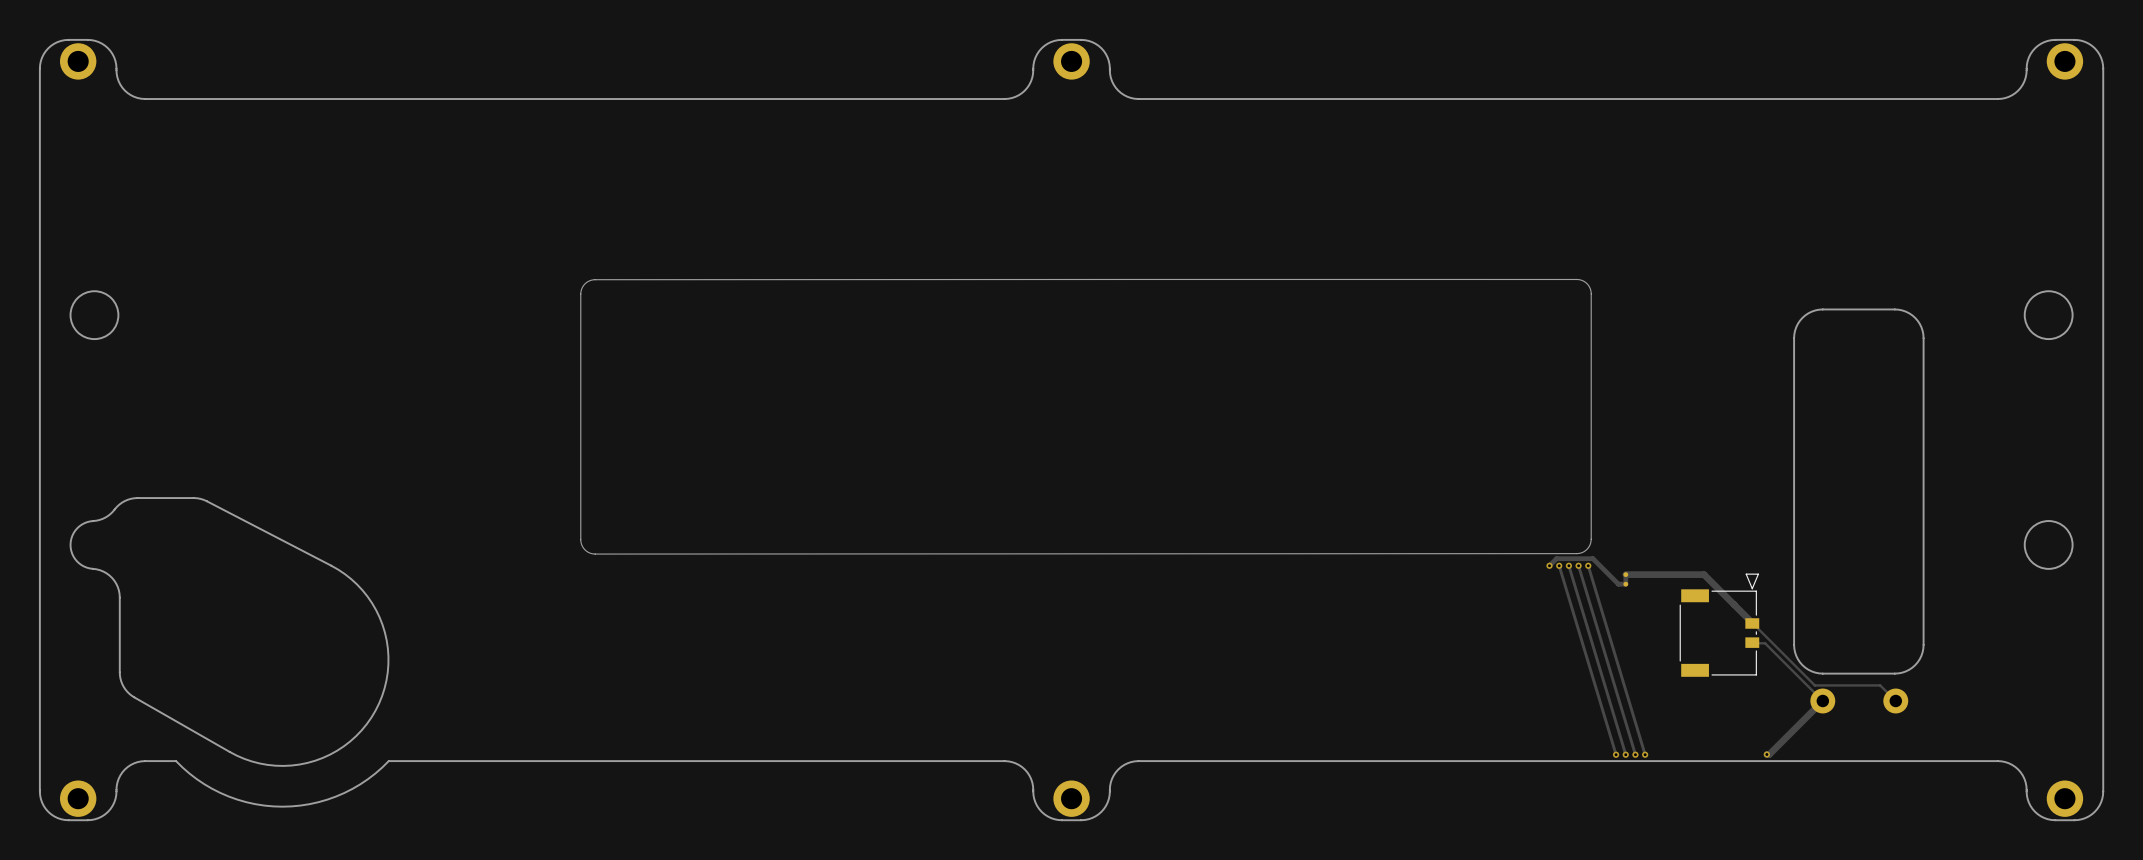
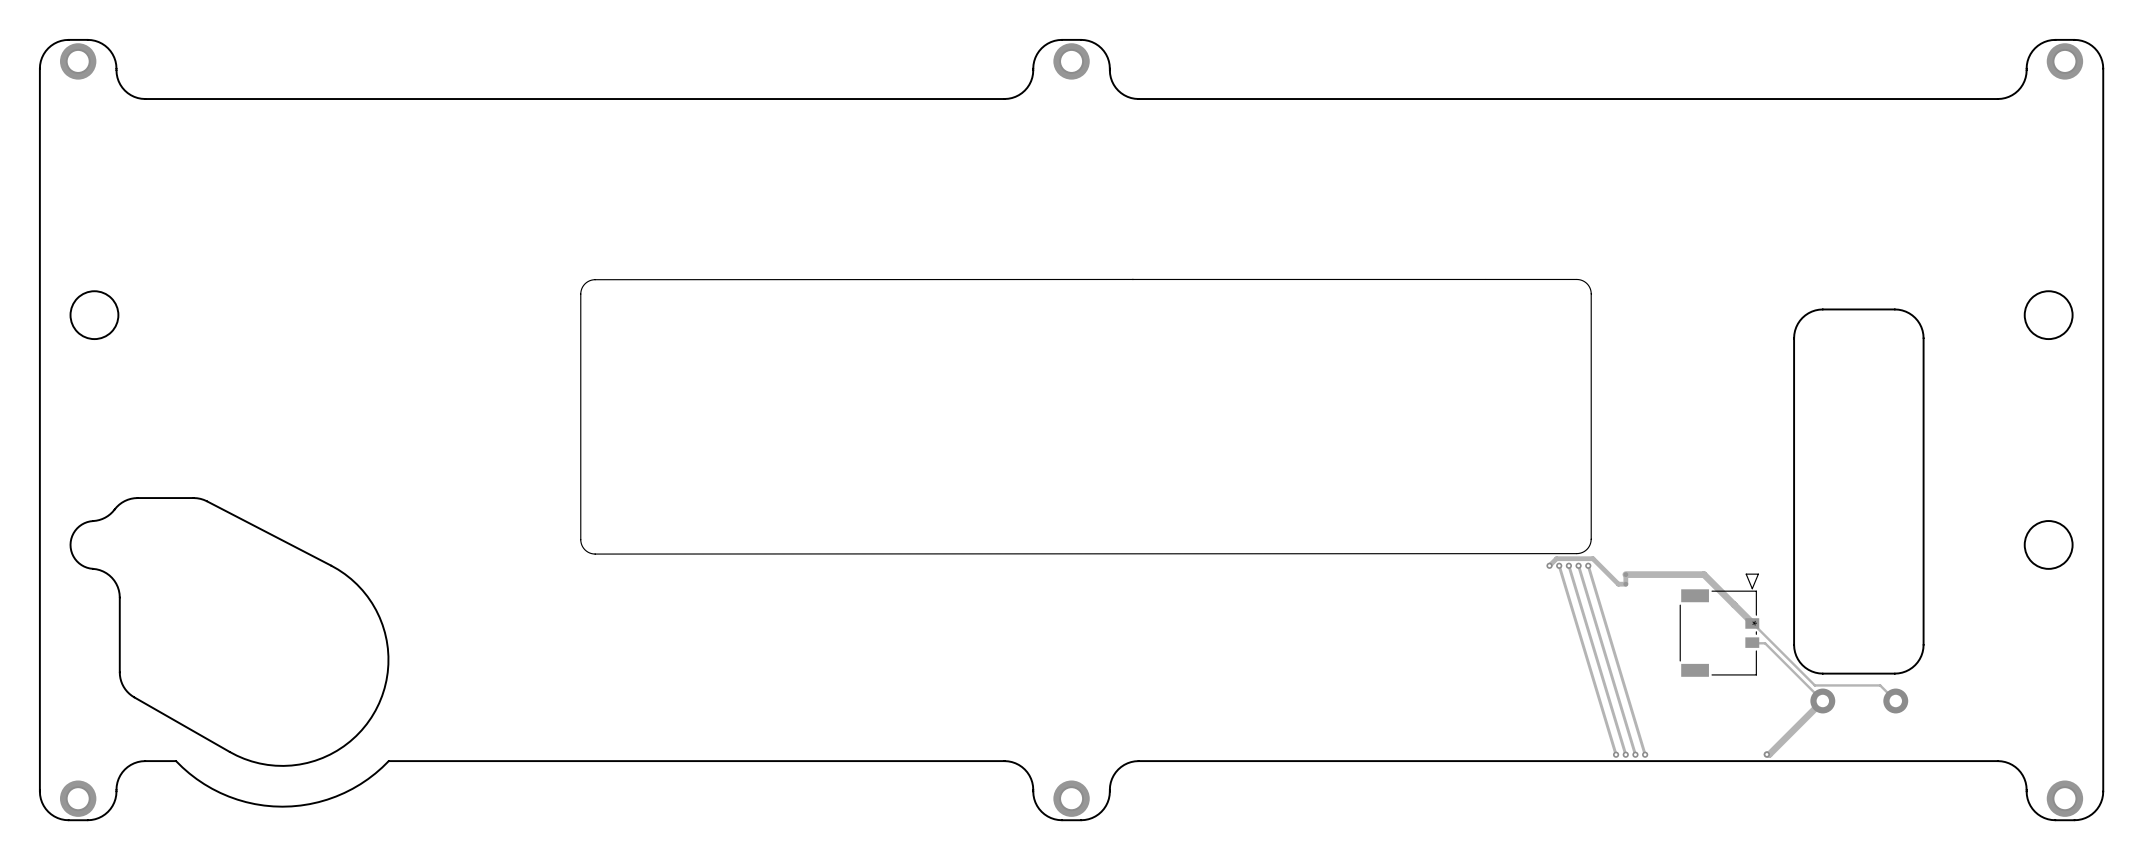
part text: none -> * (1754, 623)

